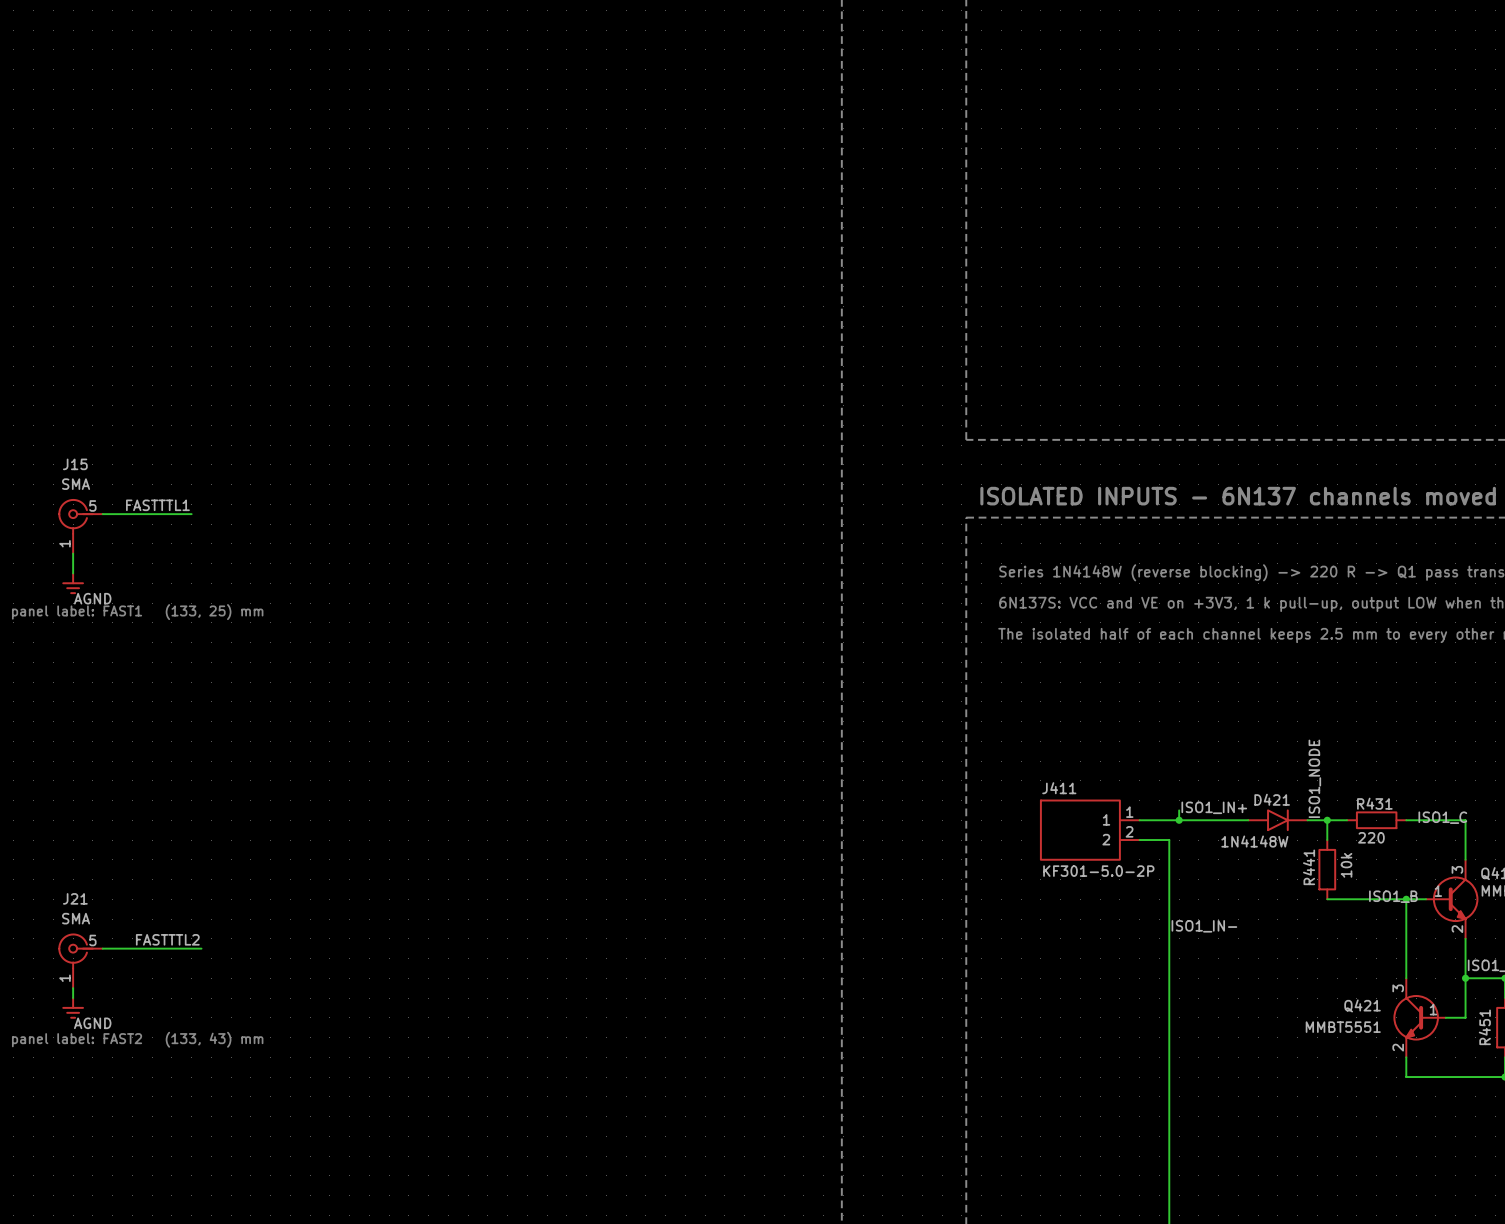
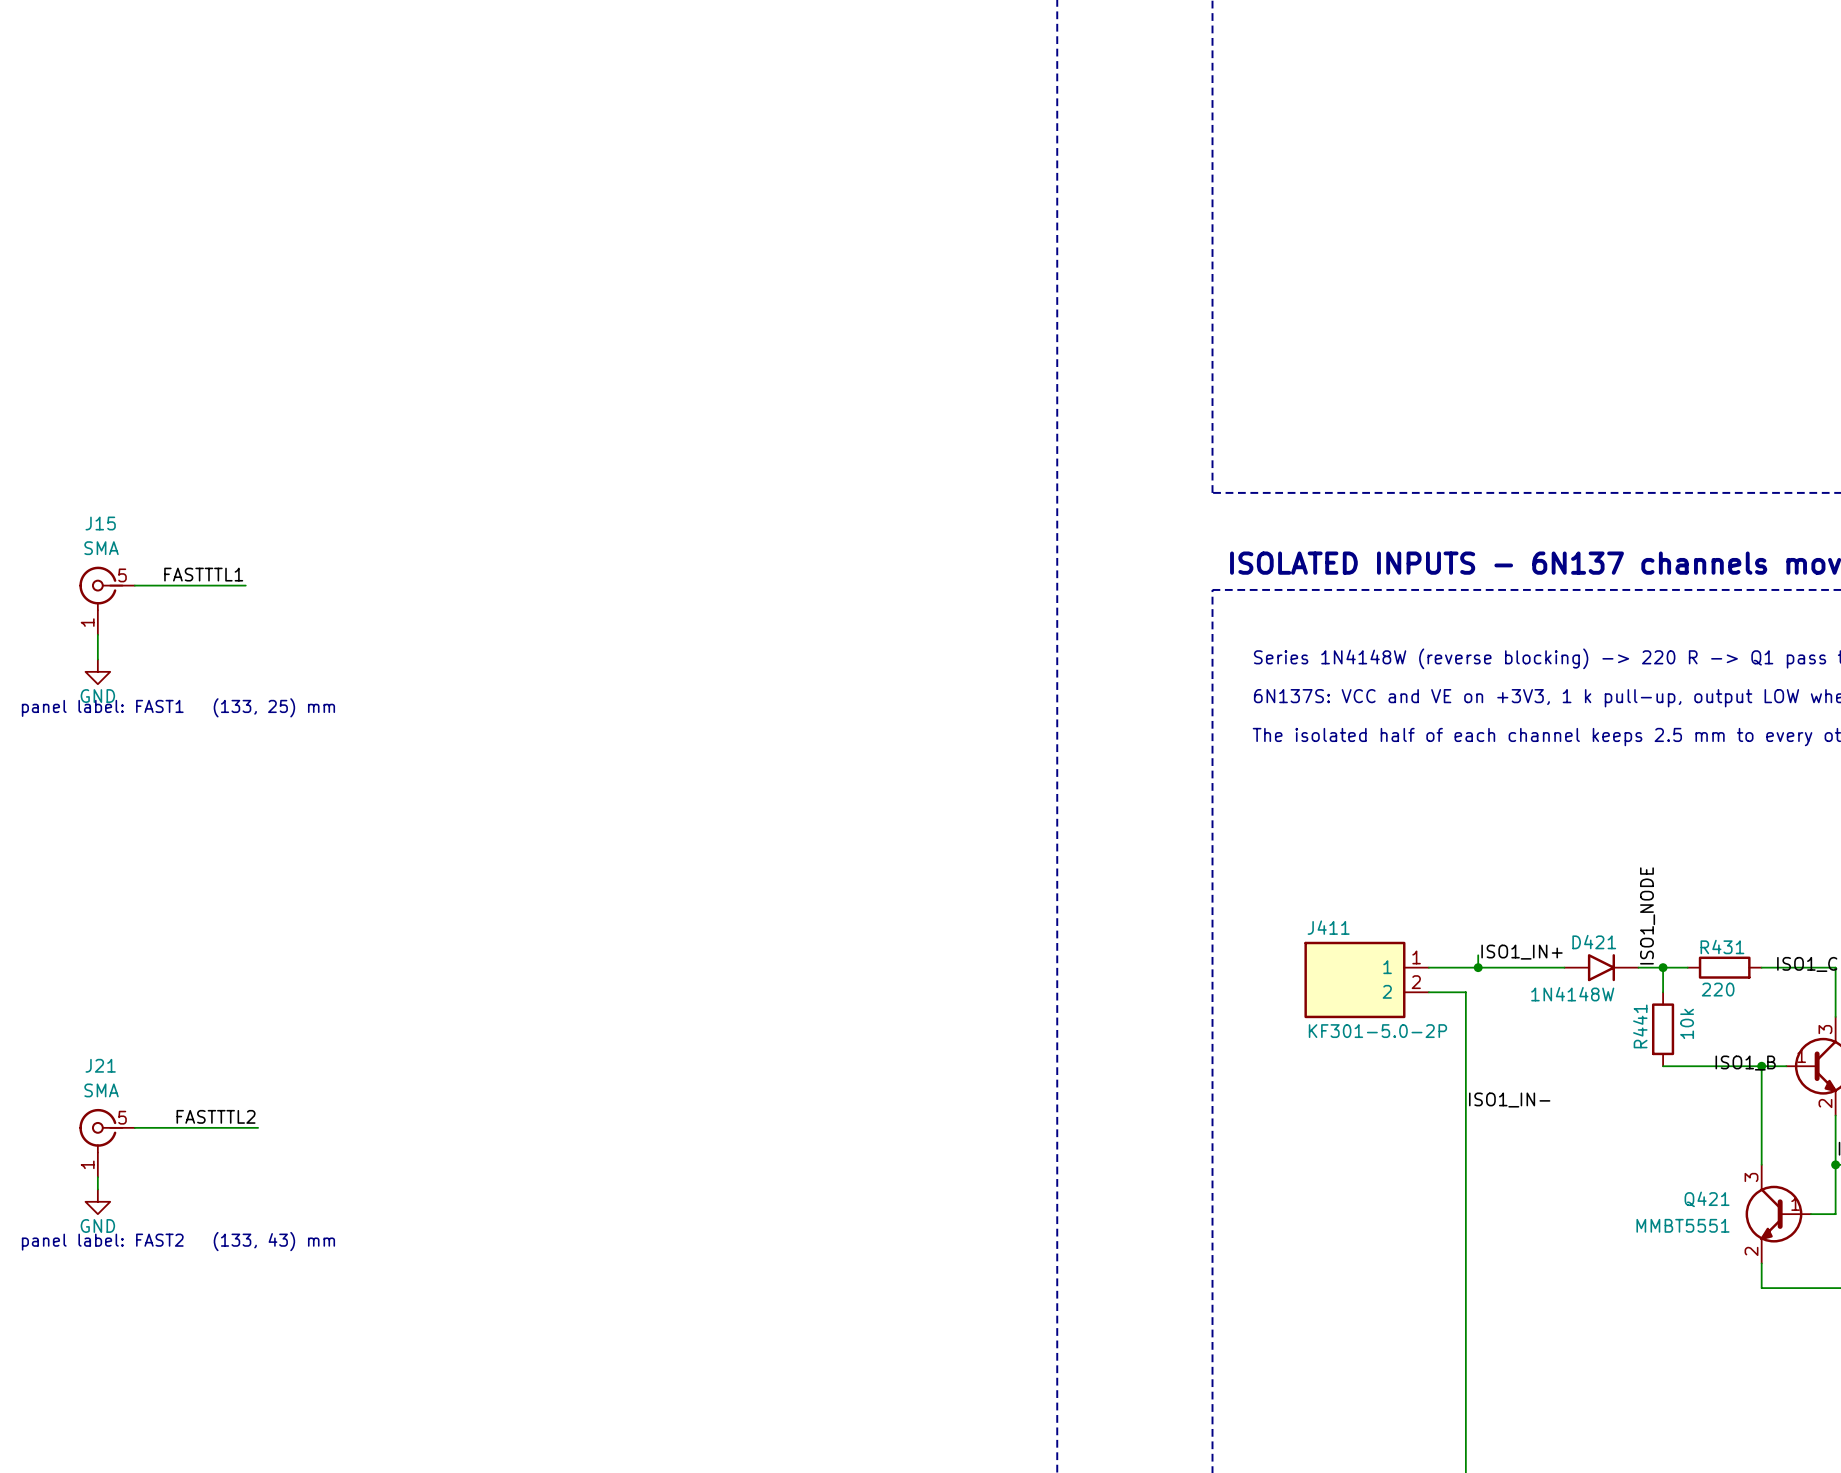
power symbol: AGND (73, 583) -> GND (97, 671)
power symbol: AGND (73, 1008) -> GND (97, 1201)

